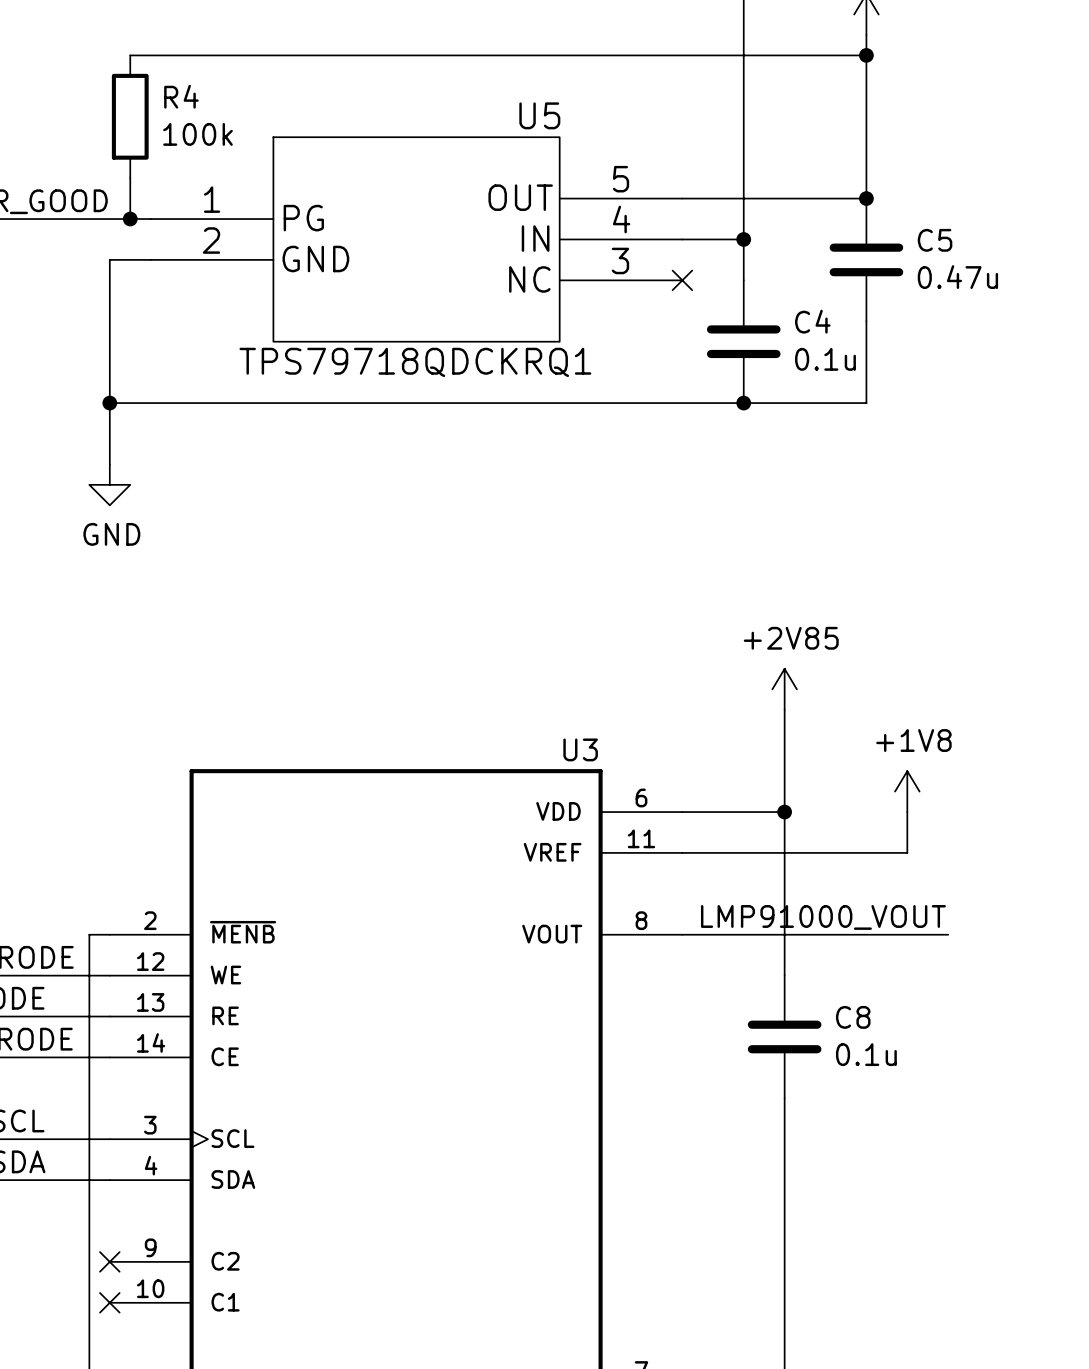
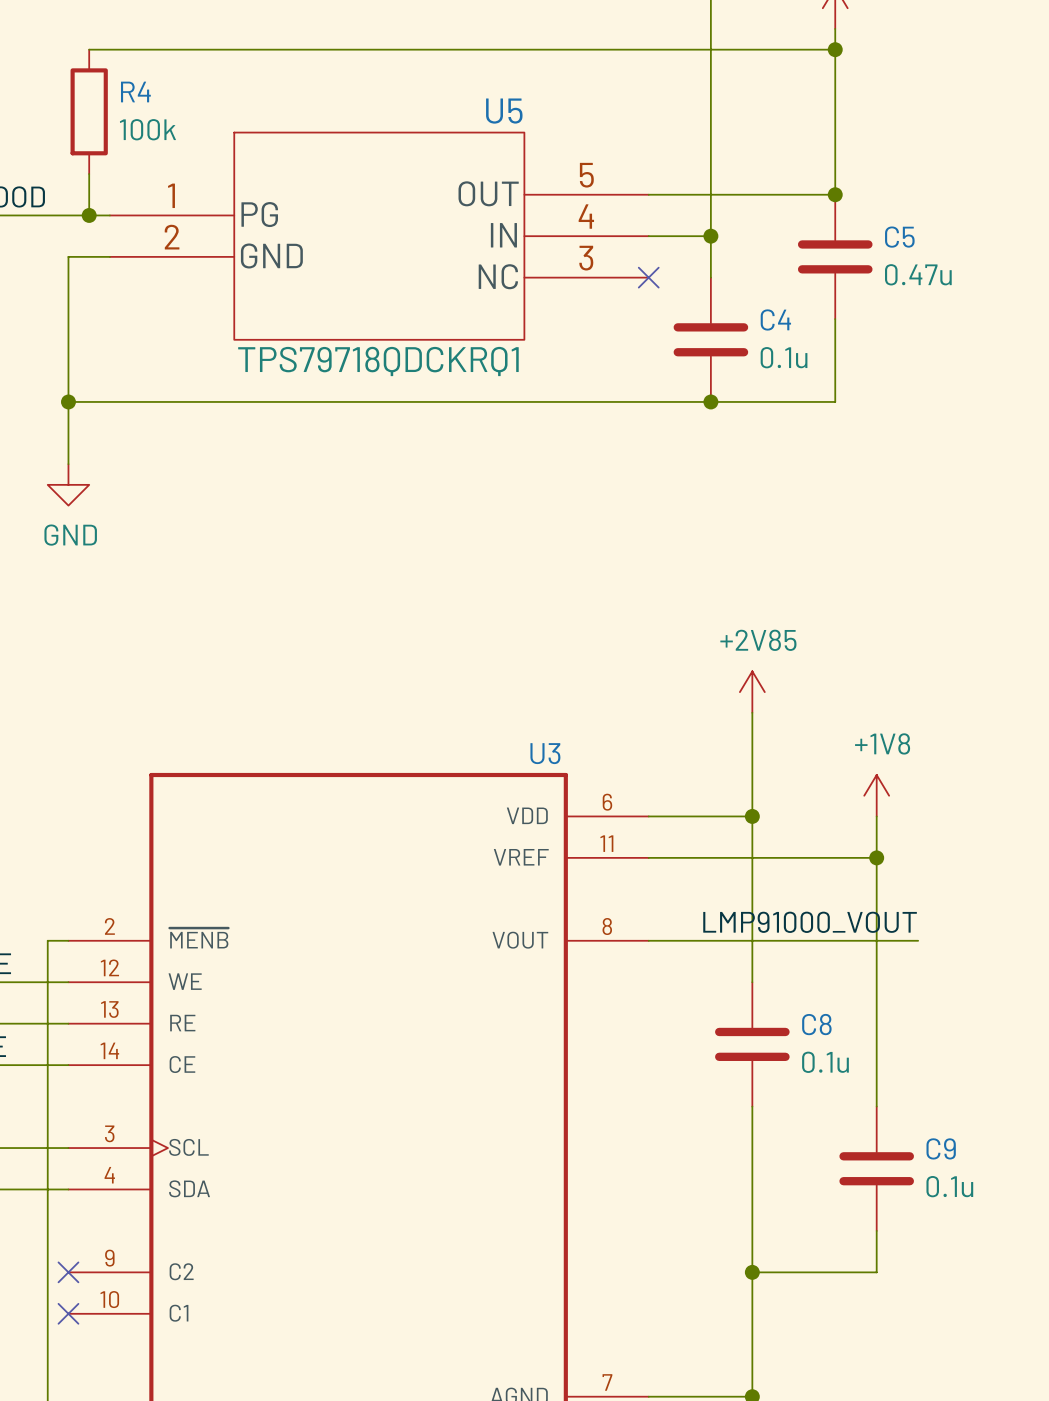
wire: none -> (876, 857) (876, 1106)
junction: none -> (876, 857)
C9: none -> 0.1u (876, 1168)
wire: none -> (876, 1230) (876, 1272) (752, 1272)
junction: none -> (752, 1272)

